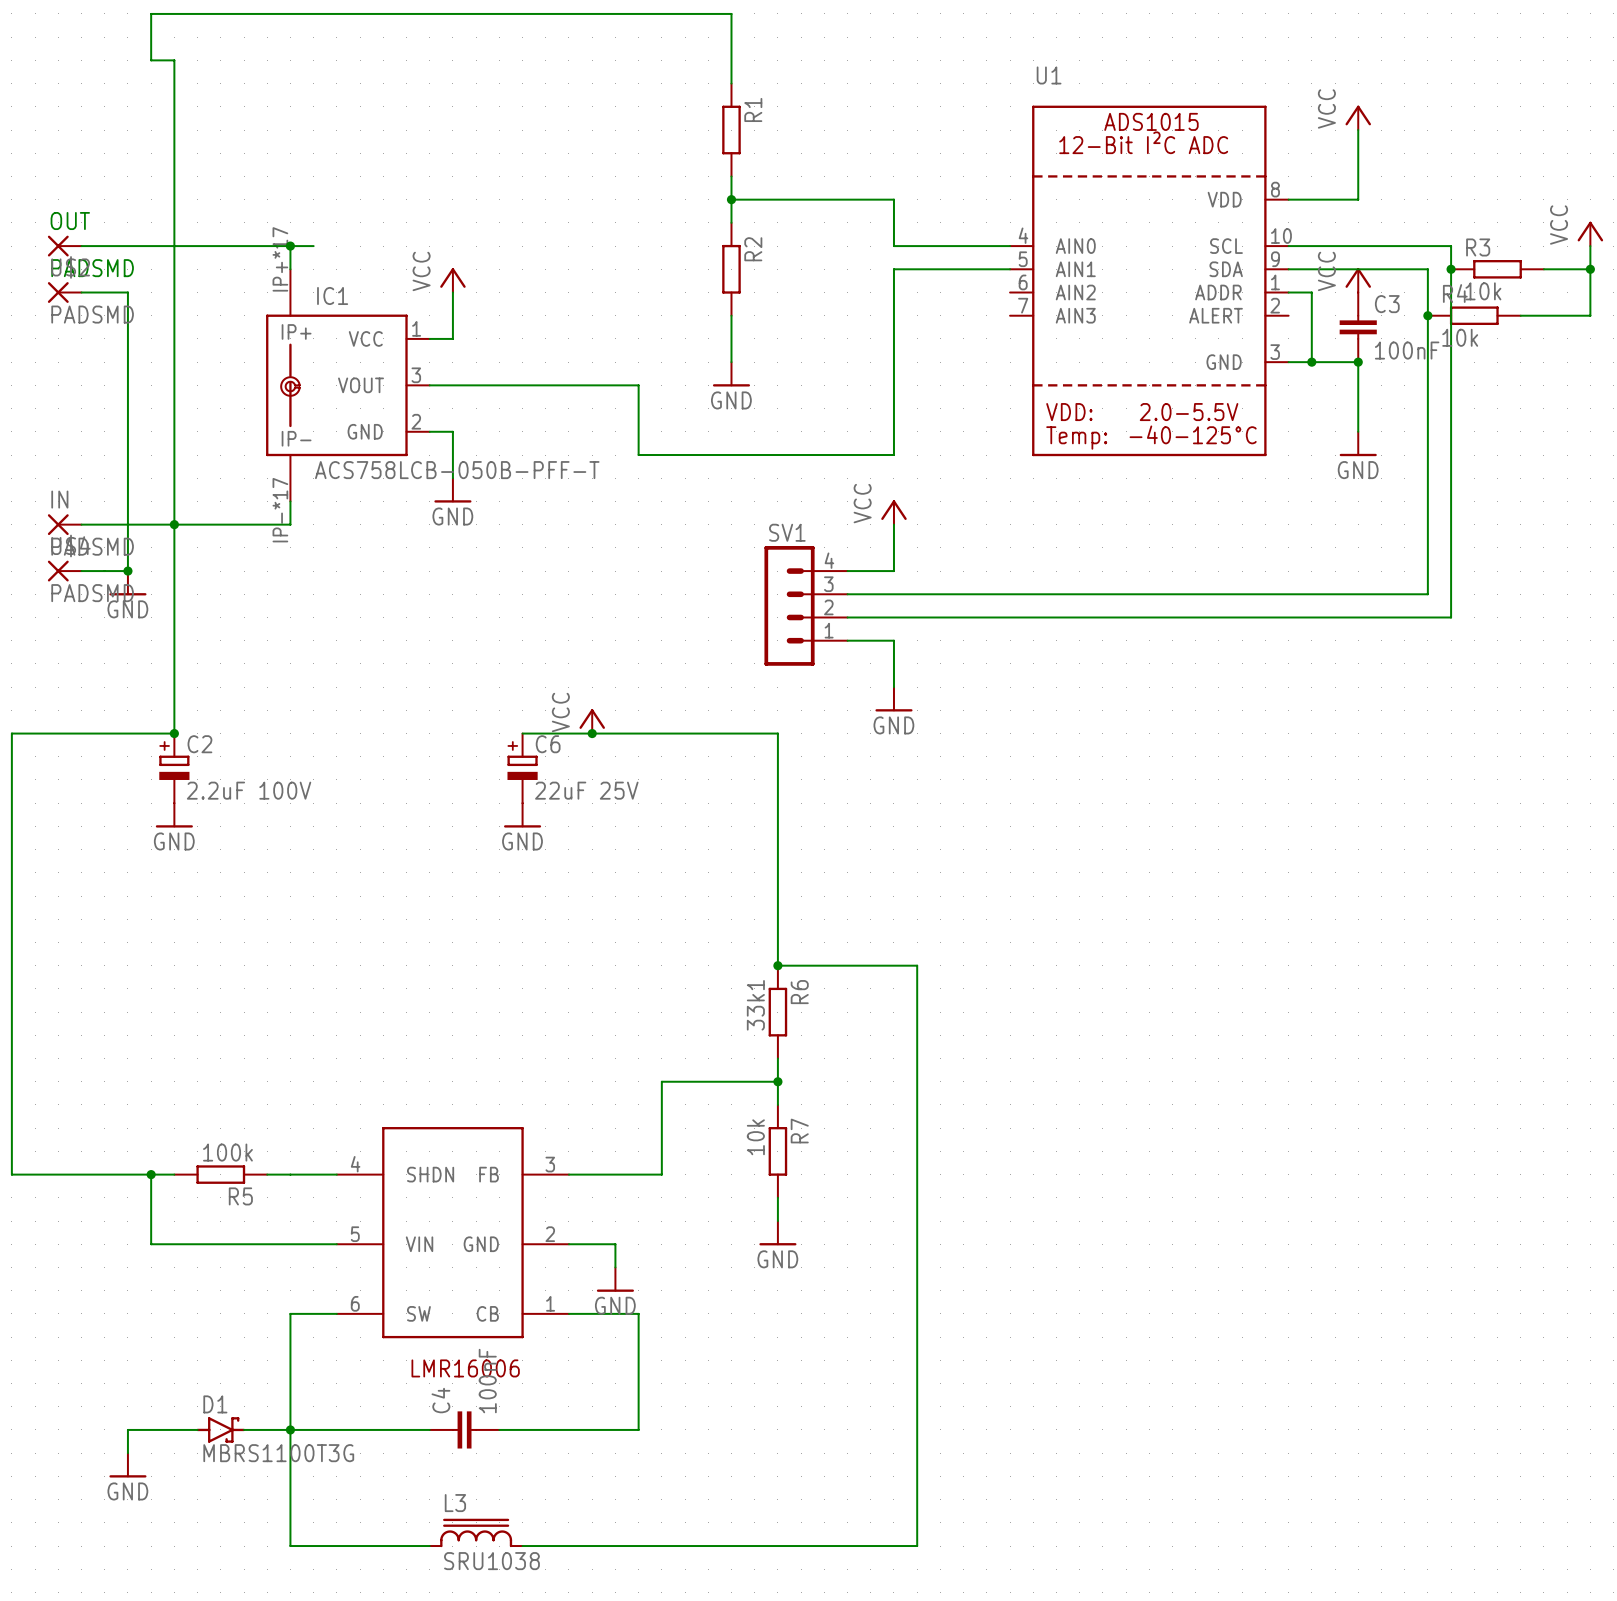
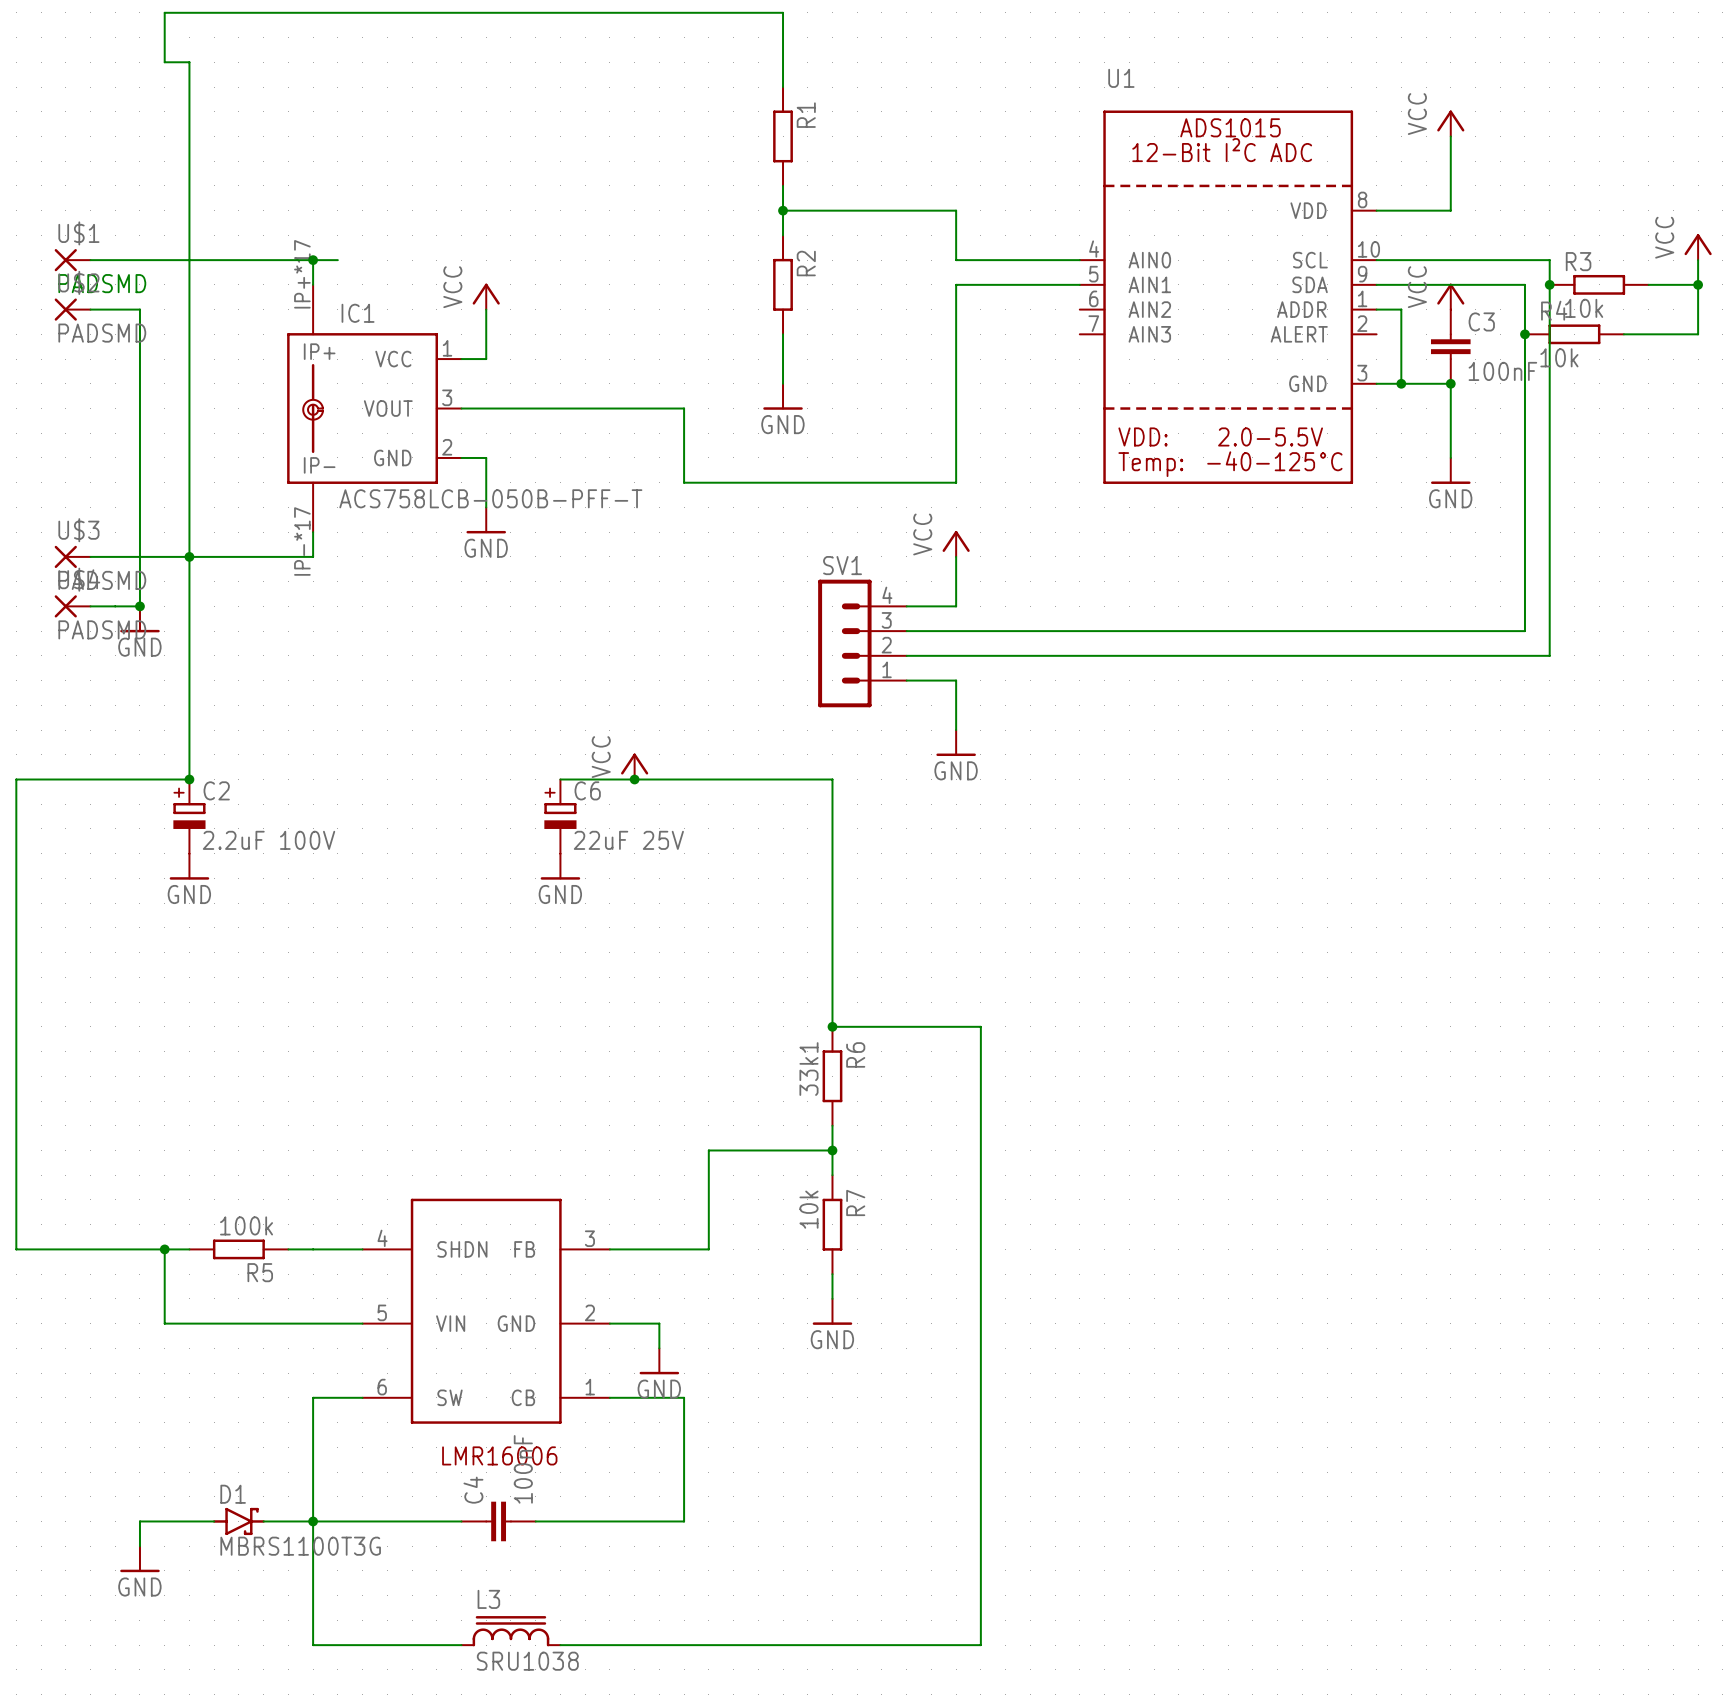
OUT name: OUT (70, 221) -> U$1 (78, 233)
IN name: IN (59, 499) -> U$3 (78, 530)

